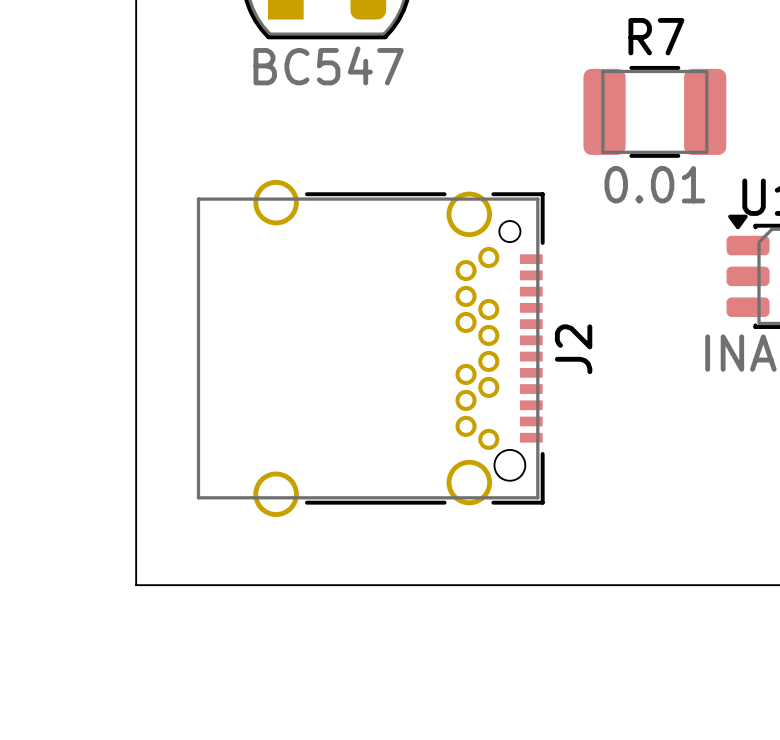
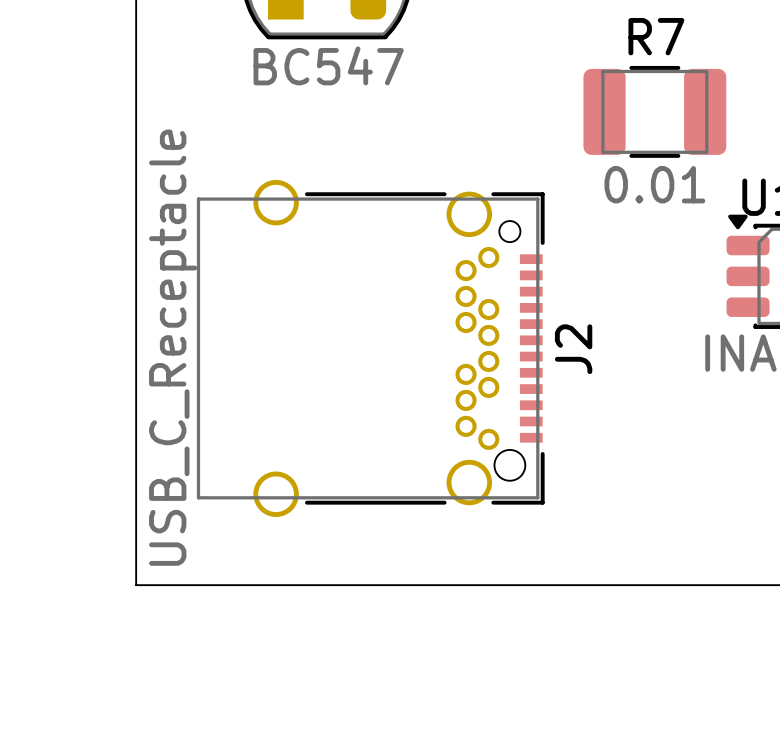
J2 value: none -> USB_C_Receptacle (173, 347)

